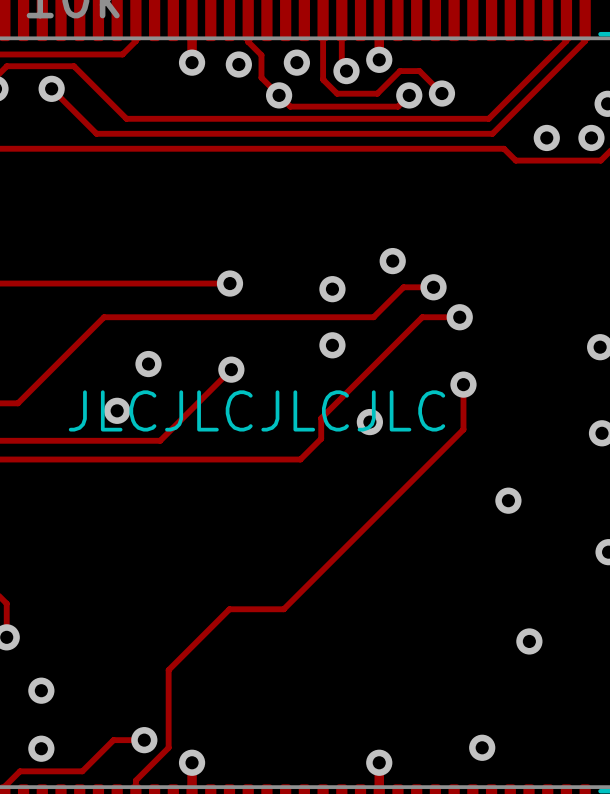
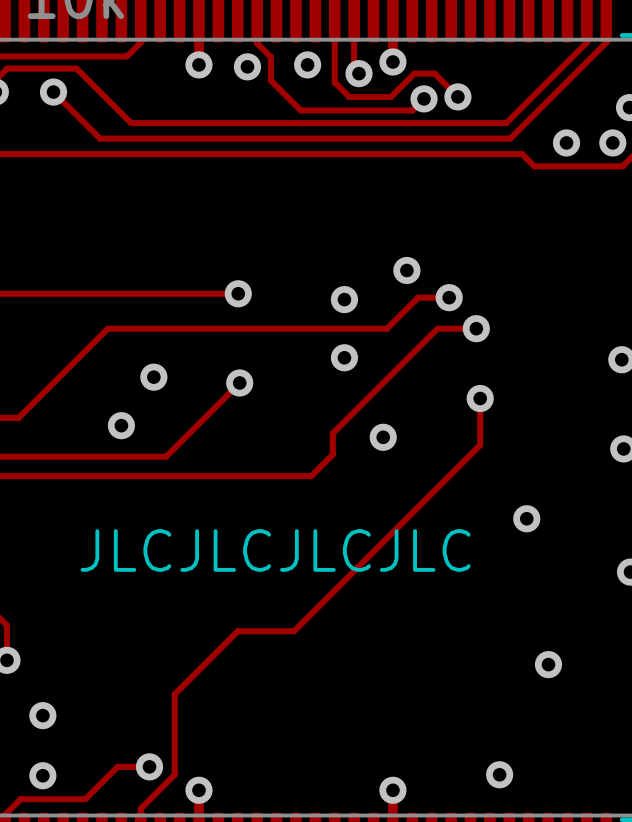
via: (279, 95) -> none
text position: JLCJLCJLCJLC (257, 410) -> JLCJLCJLCJLC (275, 550)

